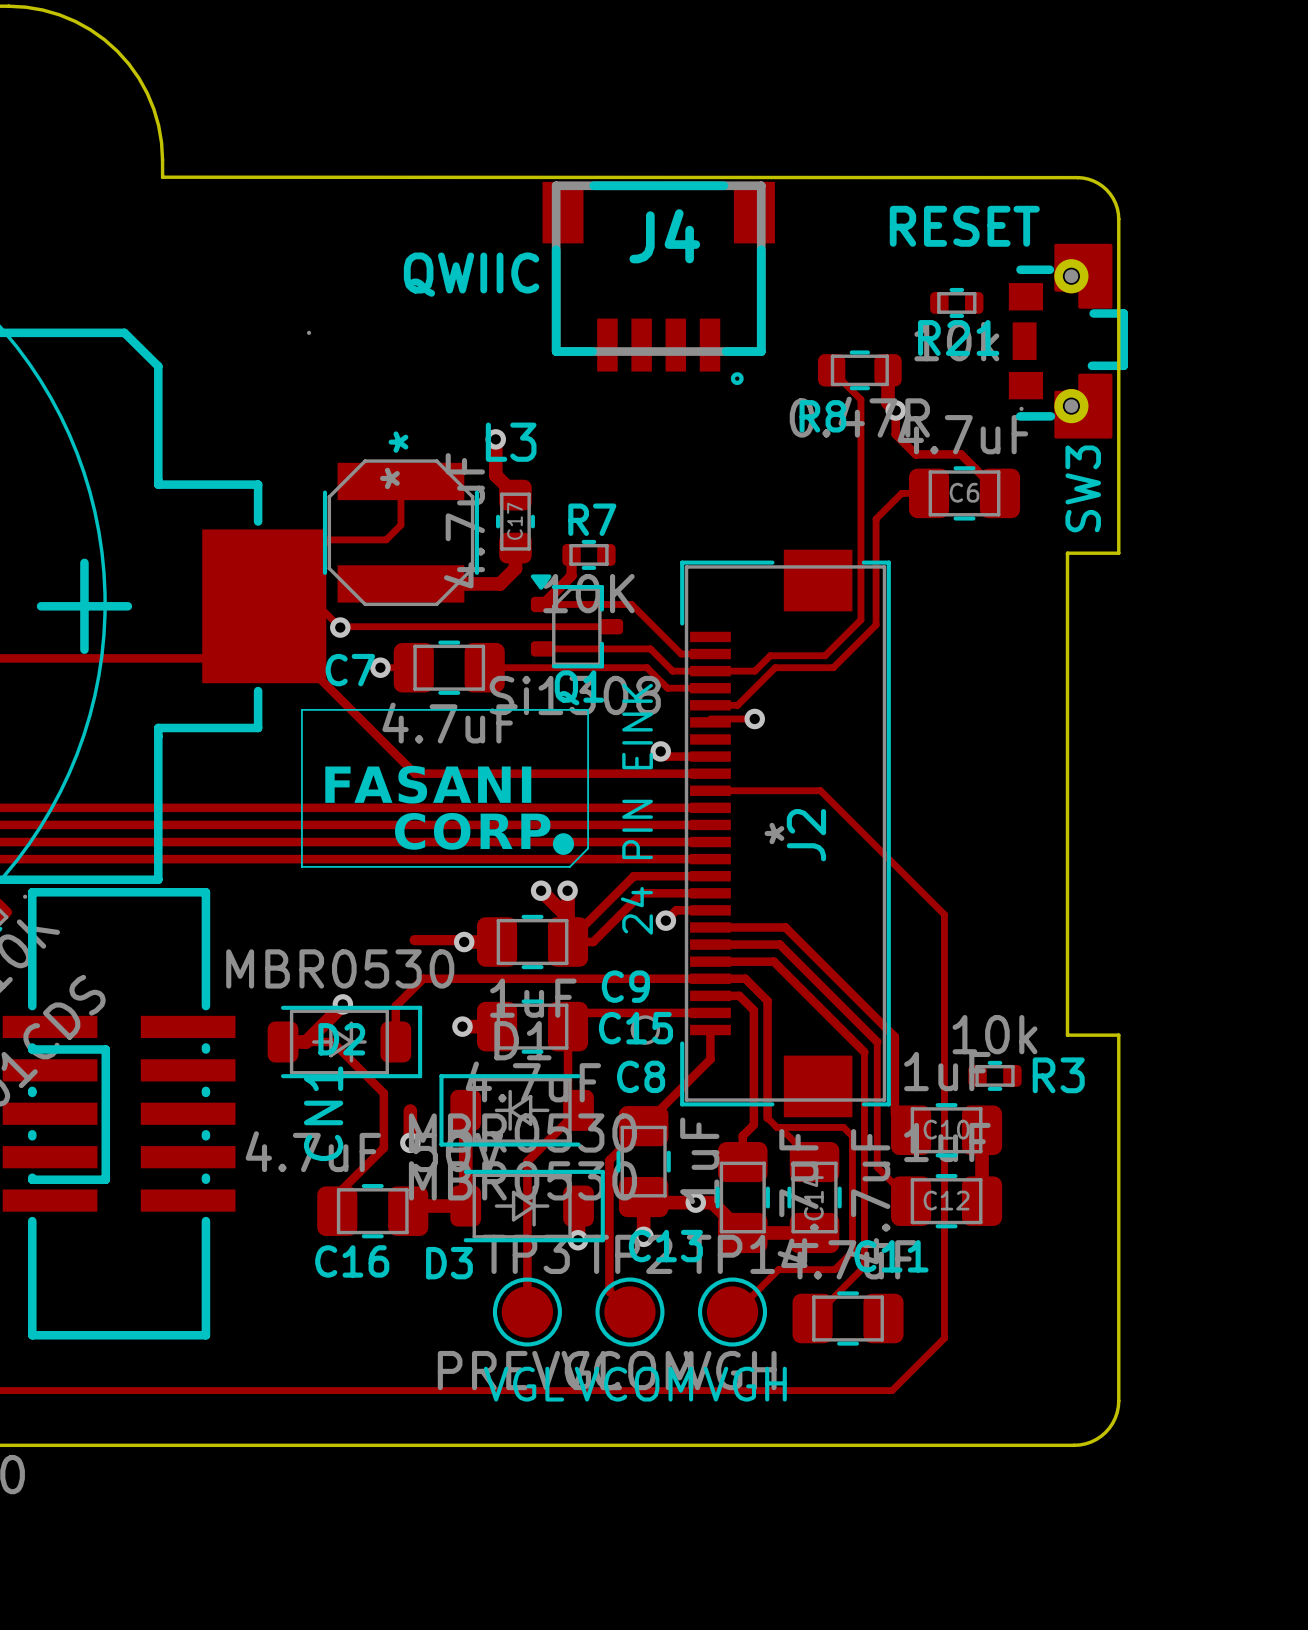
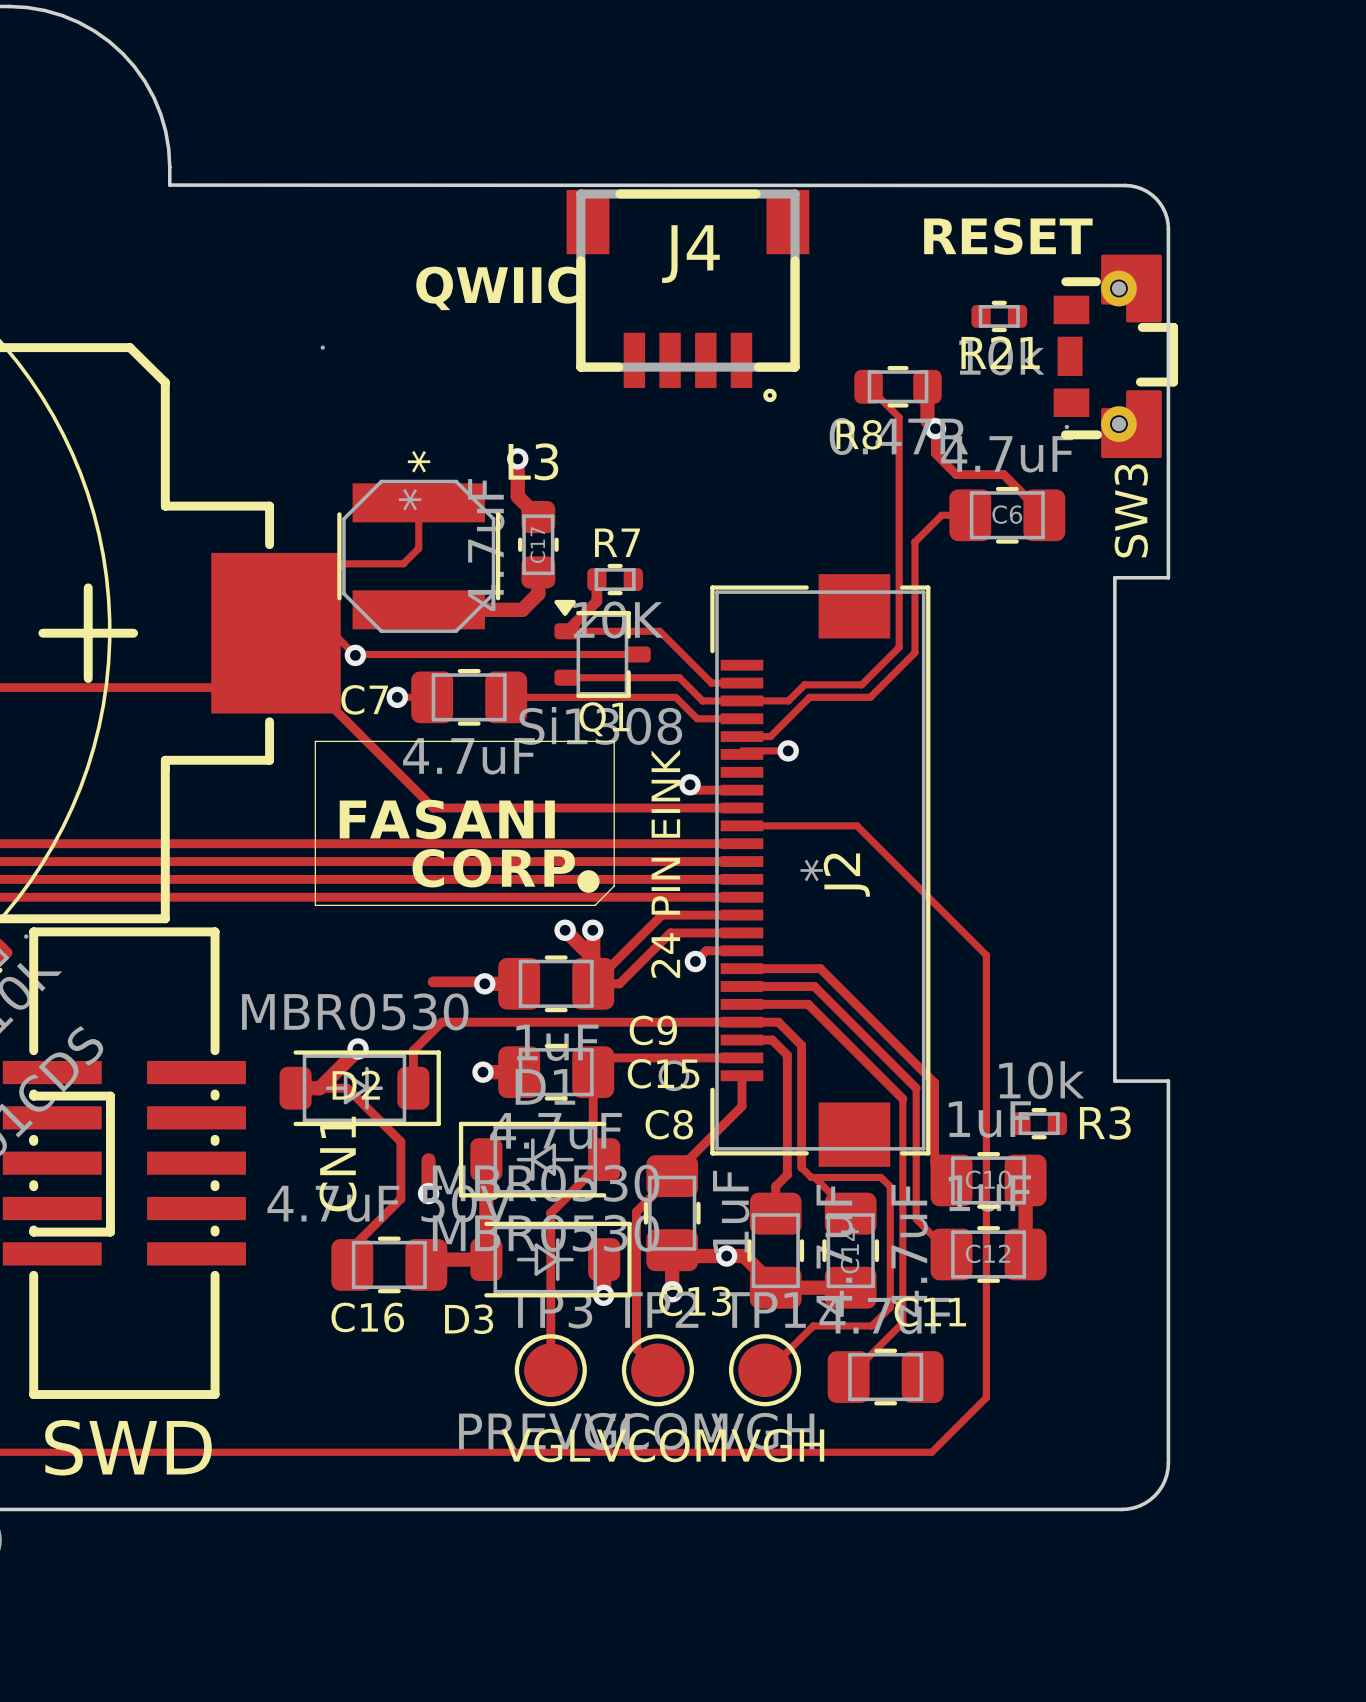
text: none -> SWD (128, 1447)

